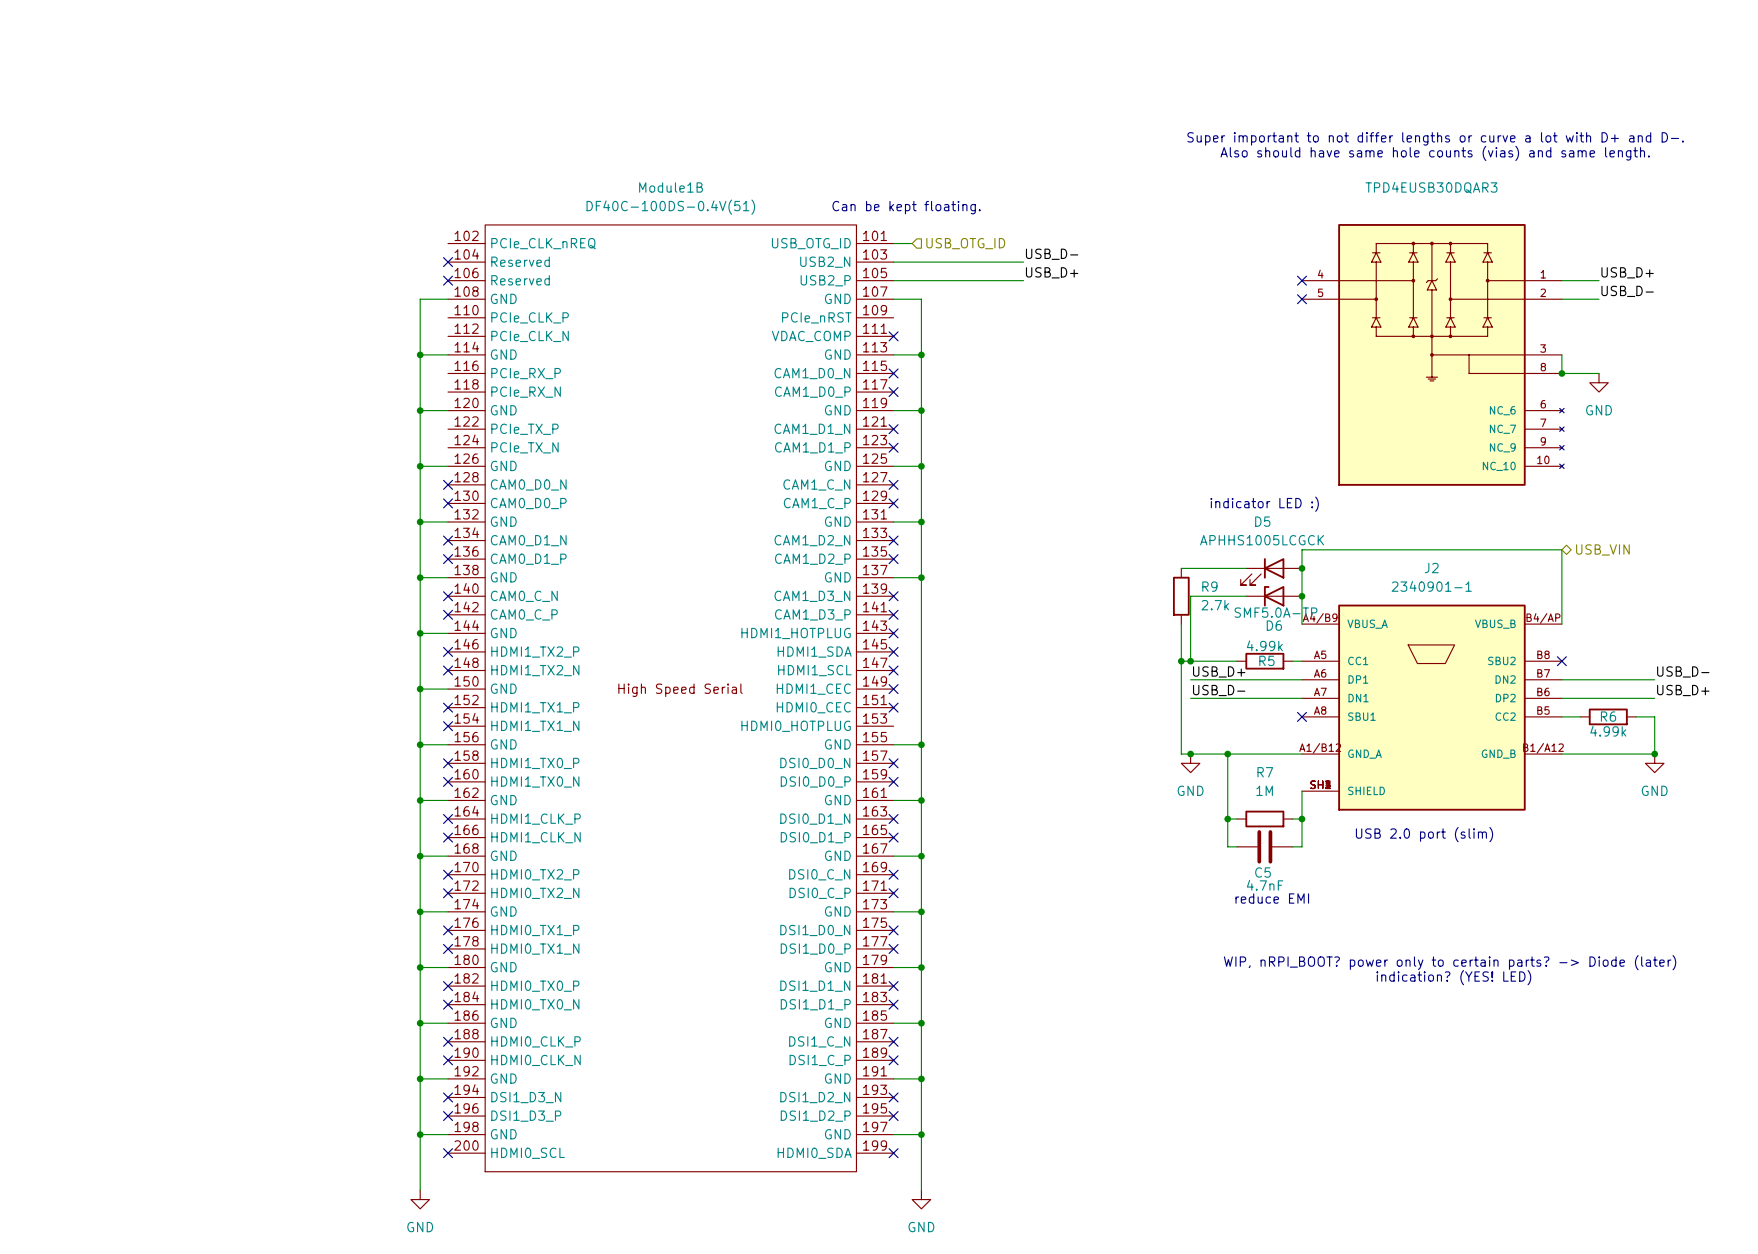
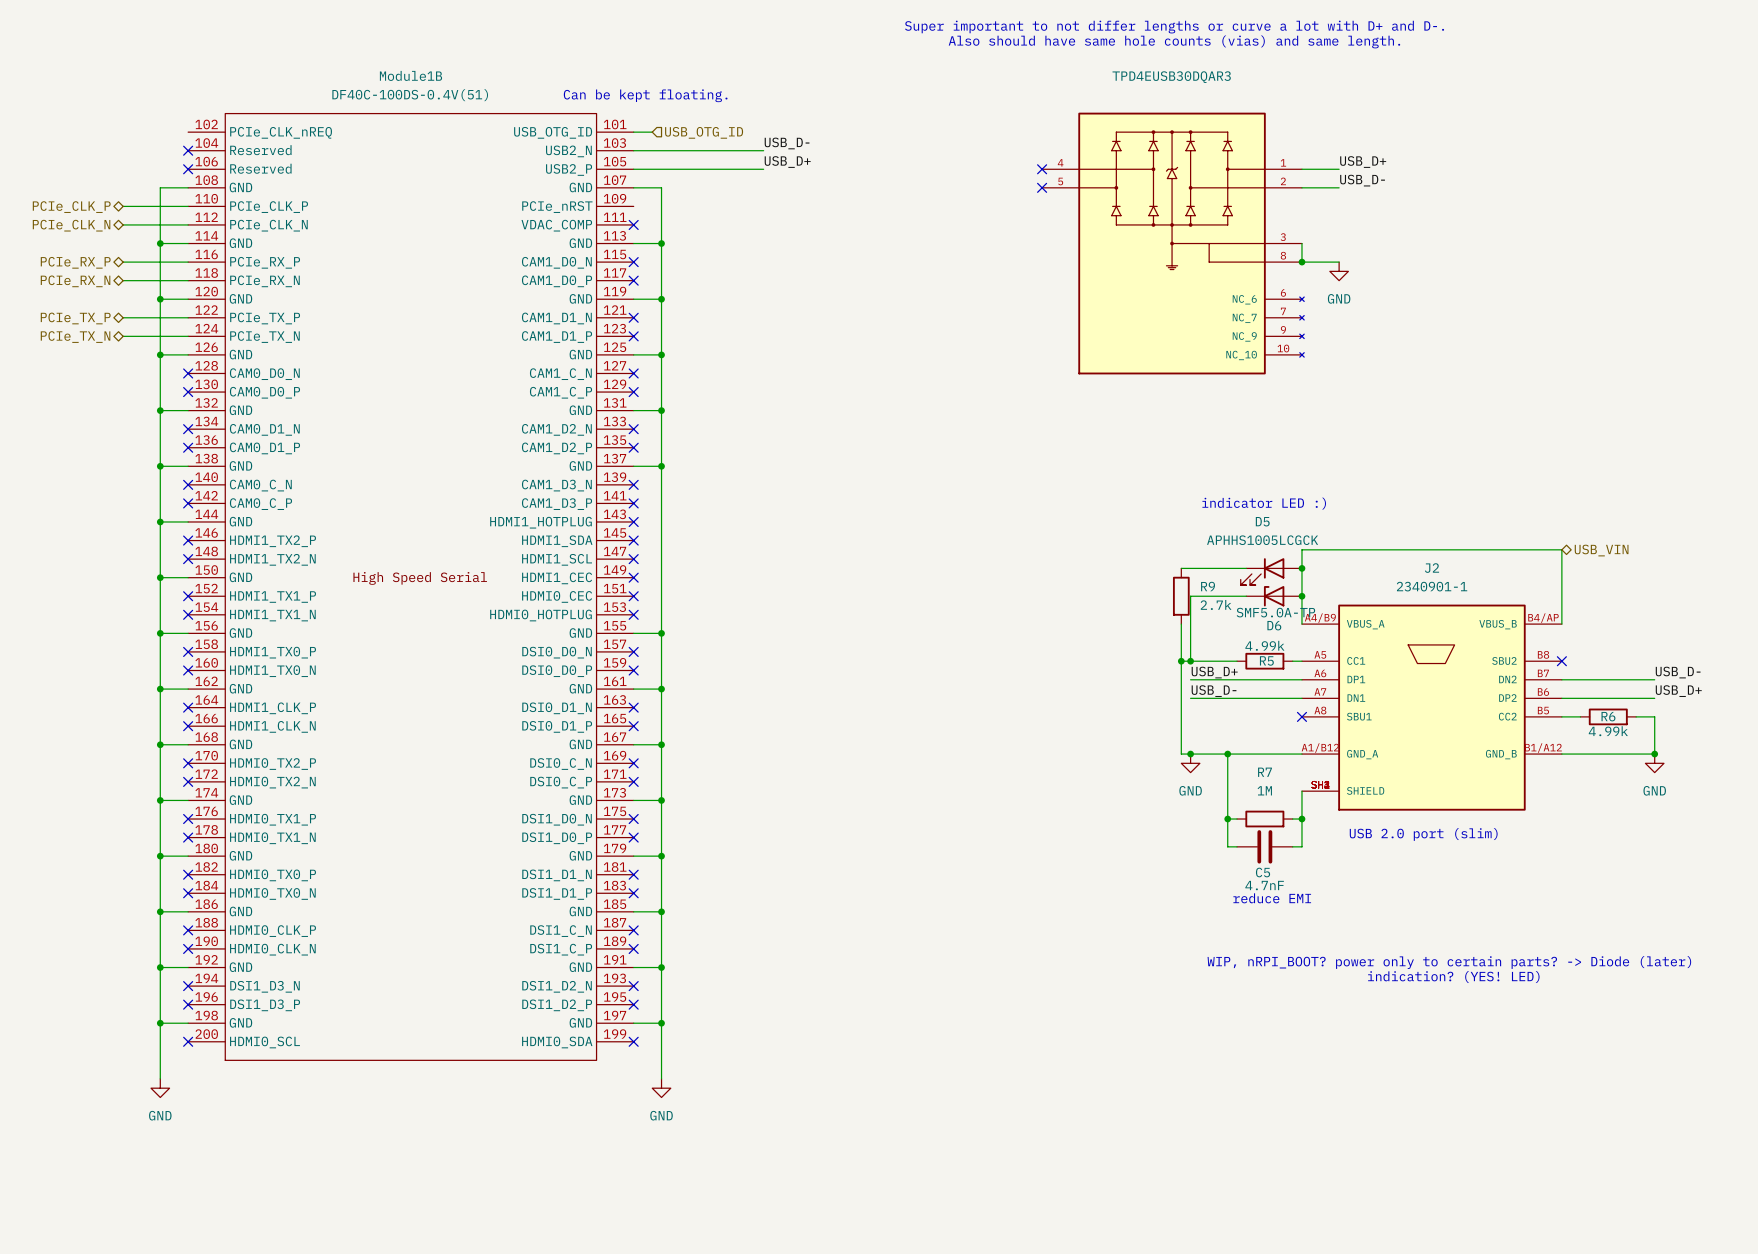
text: none -> Super important to not differ lengths or curve a lot with D+ and D-. (1174, 27)
text: none -> Also should have same hole counts (vias) and same length. (1174, 41)
text: none -> Can be kept floating. (645, 95)
wire: none -> (633, 132) (652, 132)
hierarchical label: none -> USB_OTG_ID (704, 132)
text: Super important to not differ lengths or curve a lot with D+ and D-. (1435, 138) -> none
label: none -> USB_D- (787, 143)
no-connect mark: none -> (188, 150)
wire: none -> (633, 150) (763, 150)
text: Also should have same hole counts (vias) and same length. (1435, 153) -> none
label: none -> USB_D+ (787, 162)
label: none -> USB_D+ (1363, 162)
no-connect mark: none -> (188, 169)
wire: none -> (633, 169) (763, 169)
no-connect mark: none -> (1042, 169)
wire: none -> (1301, 169) (1339, 169)
label: none -> USB_D- (1362, 180)
wire: none -> (188, 187) (160, 187) (160, 1078)
wire: none -> (633, 187) (661, 187) (661, 1078)
no-connect mark: none -> (1042, 187)
wire: none -> (1301, 187) (1339, 187)
hierarchical label: none -> PCIe_CLK_P (71, 207)
wire: none -> (123, 206) (188, 206)
text: Can be kept floating. (906, 207) -> none
wire: none -> (123, 224) (188, 224)
no-connect mark: none -> (633, 224)
hierarchical label: none -> PCIe_CLK_N (71, 225)
wire: none -> (160, 243) (188, 243)
junction: none -> (160, 243)
wire: none -> (633, 243) (661, 243)
junction: none -> (661, 243)
wire: (893, 243) (912, 243) -> none
hierarchical label: USB_OTG_ID (965, 243) -> none
wire: none -> (1301, 243) (1301, 262) (1339, 262)
label: USB_D- (1052, 254) -> none
hierarchical label: none -> PCIe_RX_P (75, 262)
wire: none -> (123, 262) (188, 262)
no-connect mark: (448, 262) -> none
no-connect mark: none -> (633, 262)
wire: (893, 262) (1023, 262) -> none
junction: none -> (1301, 262)
power symbol: none -> GND (1339, 271)
label: USB_D+ (1052, 272) -> none
label: USB_D+ (1627, 272) -> none
hierarchical label: none -> PCIe_RX_N (75, 281)
wire: none -> (123, 280) (188, 280)
no-connect mark: (448, 280) -> none
no-connect mark: none -> (633, 280)
wire: (893, 280) (1023, 280) -> none
no-connect mark: (1301, 280) -> none
wire: (1561, 280) (1599, 280) -> none
label: USB_D- (1627, 291) -> none
wire: none -> (160, 299) (188, 299)
junction: none -> (160, 299)
wire: (448, 299) (420, 299) (420, 1190) -> none
wire: none -> (633, 299) (661, 299)
junction: none -> (661, 299)
wire: (893, 299) (921, 299) (921, 1190) -> none
no-connect mark: (1301, 299) -> none
wire: (1561, 299) (1599, 299) -> none
hierarchical label: none -> PCIe_TX_P (75, 318)
wire: none -> (123, 317) (188, 317)
no-connect mark: none -> (633, 317)
hierarchical label: none -> PCIe_TX_N (75, 337)
wire: none -> (123, 336) (188, 336)
no-connect mark: none -> (633, 336)
no-connect mark: (893, 336) -> none
wire: none -> (160, 354) (188, 354)
junction: none -> (160, 354)
wire: (420, 354) (448, 354) -> none
junction: (420, 354) -> none
wire: none -> (633, 354) (661, 354)
junction: none -> (661, 354)
wire: (893, 354) (921, 354) -> none
junction: (921, 354) -> none
TPD4EUSB30DQAR3 position: (1433, 354) -> (1173, 243)
wire: (1561, 354) (1561, 373) (1599, 373) -> none
no-connect mark: none -> (188, 373)
no-connect mark: none -> (633, 373)
no-connect mark: (893, 373) -> none
junction: (1561, 373) -> none
power symbol: GND (1599, 382) -> none
no-connect mark: none -> (188, 392)
no-connect mark: none -> (633, 392)
no-connect mark: (893, 392) -> none
wire: none -> (160, 410) (188, 410)
junction: none -> (160, 410)
wire: (420, 410) (448, 410) -> none
junction: (420, 410) -> none
wire: none -> (633, 410) (661, 410)
junction: none -> (661, 410)
wire: (893, 410) (921, 410) -> none
junction: (921, 410) -> none
no-connect mark: none -> (188, 429)
no-connect mark: none -> (633, 429)
no-connect mark: (893, 429) -> none
no-connect mark: none -> (188, 447)
no-connect mark: none -> (633, 447)
no-connect mark: (893, 447) -> none
wire: none -> (160, 466) (188, 466)
junction: none -> (160, 466)
wire: (420, 466) (448, 466) -> none
junction: (420, 466) -> none
wire: none -> (633, 466) (661, 466)
junction: none -> (661, 466)
wire: (893, 466) (921, 466) -> none
junction: (921, 466) -> none
no-connect mark: none -> (188, 484)
no-connect mark: (448, 484) -> none
no-connect mark: none -> (633, 484)
no-connect mark: (893, 484) -> none
no-connect mark: none -> (188, 503)
no-connect mark: (448, 503) -> none
no-connect mark: none -> (633, 503)
no-connect mark: (893, 503) -> none
wire: none -> (160, 521) (188, 521)
junction: none -> (160, 521)
wire: (420, 521) (448, 521) -> none
junction: (420, 521) -> none
no-connect mark: none -> (633, 521)
wire: (893, 521) (921, 521) -> none
junction: (921, 521) -> none
no-connect mark: none -> (188, 540)
no-connect mark: (448, 540) -> none
no-connect mark: none -> (633, 540)
no-connect mark: (893, 540) -> none
no-connect mark: none -> (188, 559)
no-connect mark: (448, 559) -> none
no-connect mark: none -> (633, 559)
no-connect mark: (893, 559) -> none
wire: none -> (160, 577) (188, 577)
junction: none -> (160, 577)
wire: (420, 577) (448, 577) -> none
junction: (420, 577) -> none
no-connect mark: none -> (633, 577)
wire: (893, 577) (921, 577) -> none
junction: (921, 577) -> none
no-connect mark: none -> (188, 596)
no-connect mark: (448, 596) -> none
no-connect mark: none -> (633, 596)
no-connect mark: (893, 596) -> none
no-connect mark: none -> (188, 614)
no-connect mark: (448, 614) -> none
no-connect mark: none -> (633, 614)
no-connect mark: (893, 614) -> none
wire: none -> (160, 633) (188, 633)
junction: none -> (160, 633)
wire: (420, 633) (448, 633) -> none
junction: (420, 633) -> none
wire: none -> (633, 633) (661, 633)
junction: none -> (661, 633)
no-connect mark: (893, 633) -> none
no-connect mark: none -> (188, 651)
no-connect mark: (448, 651) -> none
no-connect mark: none -> (633, 651)
no-connect mark: (893, 651) -> none
no-connect mark: none -> (188, 670)
no-connect mark: (448, 670) -> none
no-connect mark: none -> (633, 670)
no-connect mark: (893, 670) -> none
wire: none -> (160, 689) (188, 689)
junction: none -> (160, 689)
wire: (420, 689) (448, 689) -> none
junction: (420, 689) -> none
wire: none -> (633, 689) (661, 689)
junction: none -> (661, 689)
no-connect mark: (893, 689) -> none
Module1B position: (670, 698) -> (410, 586)
no-connect mark: none -> (188, 707)
no-connect mark: (448, 707) -> none
no-connect mark: none -> (633, 707)
no-connect mark: (893, 707) -> none
no-connect mark: none -> (188, 726)
no-connect mark: (448, 726) -> none
no-connect mark: none -> (633, 726)
wire: none -> (160, 744) (188, 744)
junction: none -> (160, 744)
wire: (420, 744) (448, 744) -> none
junction: (420, 744) -> none
wire: none -> (633, 744) (661, 744)
junction: none -> (661, 744)
wire: (893, 744) (921, 744) -> none
junction: (921, 744) -> none
no-connect mark: none -> (188, 763)
no-connect mark: (448, 763) -> none
no-connect mark: none -> (633, 763)
no-connect mark: (893, 763) -> none
no-connect mark: none -> (188, 781)
no-connect mark: (448, 781) -> none
no-connect mark: none -> (633, 781)
no-connect mark: (893, 781) -> none
wire: none -> (160, 800) (188, 800)
junction: none -> (160, 800)
wire: (420, 800) (448, 800) -> none
junction: (420, 800) -> none
wire: none -> (633, 800) (661, 800)
junction: none -> (661, 800)
wire: (893, 800) (921, 800) -> none
junction: (921, 800) -> none
no-connect mark: none -> (188, 819)
no-connect mark: (448, 819) -> none
no-connect mark: none -> (633, 819)
no-connect mark: (893, 819) -> none
no-connect mark: none -> (188, 837)
no-connect mark: (448, 837) -> none
no-connect mark: none -> (633, 837)
no-connect mark: (893, 837) -> none
wire: none -> (160, 856) (188, 856)
junction: none -> (160, 856)
wire: (420, 856) (448, 856) -> none
junction: (420, 856) -> none
wire: none -> (633, 856) (661, 856)
junction: none -> (661, 856)
wire: (893, 856) (921, 856) -> none
junction: (921, 856) -> none
no-connect mark: none -> (188, 874)
no-connect mark: (448, 874) -> none
no-connect mark: none -> (633, 874)
no-connect mark: (893, 874) -> none
no-connect mark: none -> (188, 893)
no-connect mark: (448, 893) -> none
no-connect mark: none -> (633, 893)
no-connect mark: (893, 893) -> none
wire: none -> (160, 911) (188, 911)
junction: none -> (160, 911)
wire: (420, 911) (448, 911) -> none
junction: (420, 911) -> none
wire: none -> (633, 911) (661, 911)
junction: none -> (661, 911)
wire: (893, 911) (921, 911) -> none
junction: (921, 911) -> none
no-connect mark: none -> (188, 930)
no-connect mark: (448, 930) -> none
no-connect mark: none -> (633, 930)
no-connect mark: (893, 930) -> none
no-connect mark: none -> (188, 948)
no-connect mark: (448, 948) -> none
no-connect mark: none -> (633, 948)
no-connect mark: (893, 948) -> none
wire: none -> (160, 967) (188, 967)
junction: none -> (160, 967)
wire: (420, 967) (448, 967) -> none
junction: (420, 967) -> none
wire: none -> (633, 967) (661, 967)
junction: none -> (661, 967)
wire: (893, 967) (921, 967) -> none
junction: (921, 967) -> none
no-connect mark: none -> (188, 986)
no-connect mark: (448, 986) -> none
no-connect mark: none -> (633, 986)
no-connect mark: (893, 986) -> none
no-connect mark: none -> (188, 1004)
no-connect mark: (448, 1004) -> none
no-connect mark: none -> (633, 1004)
no-connect mark: (893, 1004) -> none
wire: none -> (160, 1023) (188, 1023)
junction: none -> (160, 1023)
wire: (420, 1023) (448, 1023) -> none
junction: (420, 1023) -> none
wire: none -> (633, 1023) (661, 1023)
junction: none -> (661, 1023)
wire: (893, 1023) (921, 1023) -> none
junction: (921, 1023) -> none
no-connect mark: none -> (188, 1041)
no-connect mark: (448, 1041) -> none
no-connect mark: none -> (633, 1041)
no-connect mark: (893, 1041) -> none
no-connect mark: (448, 1060) -> none
no-connect mark: (893, 1060) -> none
wire: (420, 1078) (448, 1078) -> none
junction: (420, 1078) -> none
wire: (893, 1078) (921, 1078) -> none
junction: (921, 1078) -> none
power symbol: none -> GND (160, 1088)
power symbol: none -> GND (661, 1088)
no-connect mark: (448, 1097) -> none
no-connect mark: (893, 1097) -> none
no-connect mark: (448, 1116) -> none
no-connect mark: (893, 1116) -> none
wire: (420, 1134) (448, 1134) -> none
junction: (420, 1134) -> none
wire: (893, 1134) (921, 1134) -> none
junction: (921, 1134) -> none
no-connect mark: (448, 1153) -> none
no-connect mark: (893, 1153) -> none
power symbol: GND (420, 1199) -> none
power symbol: GND (921, 1199) -> none

